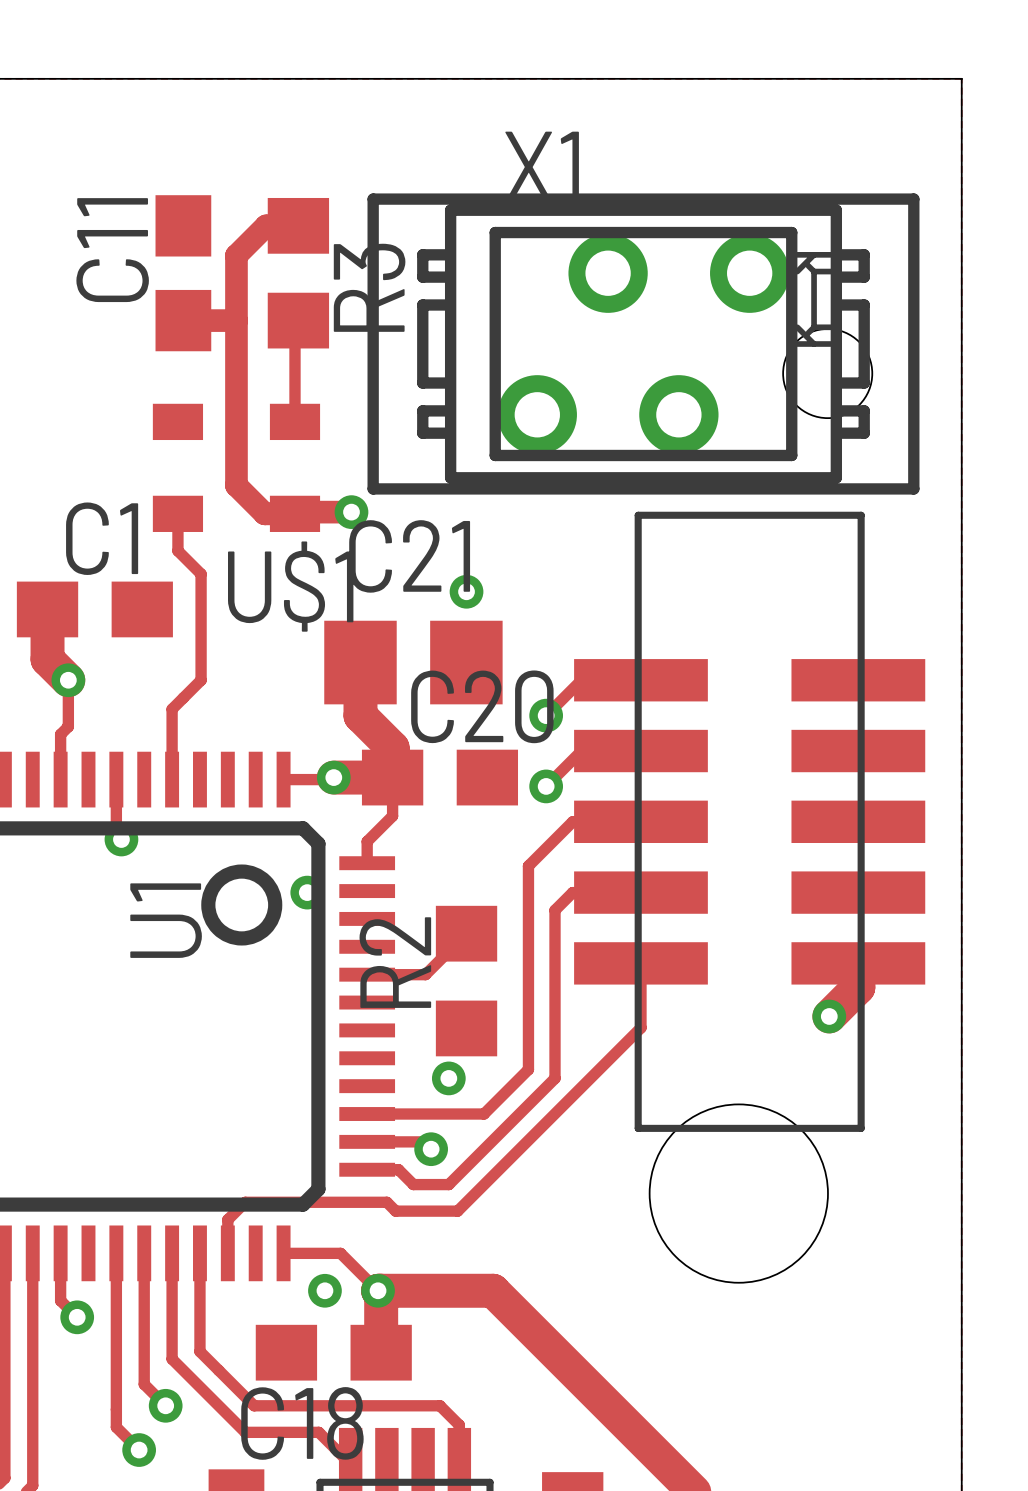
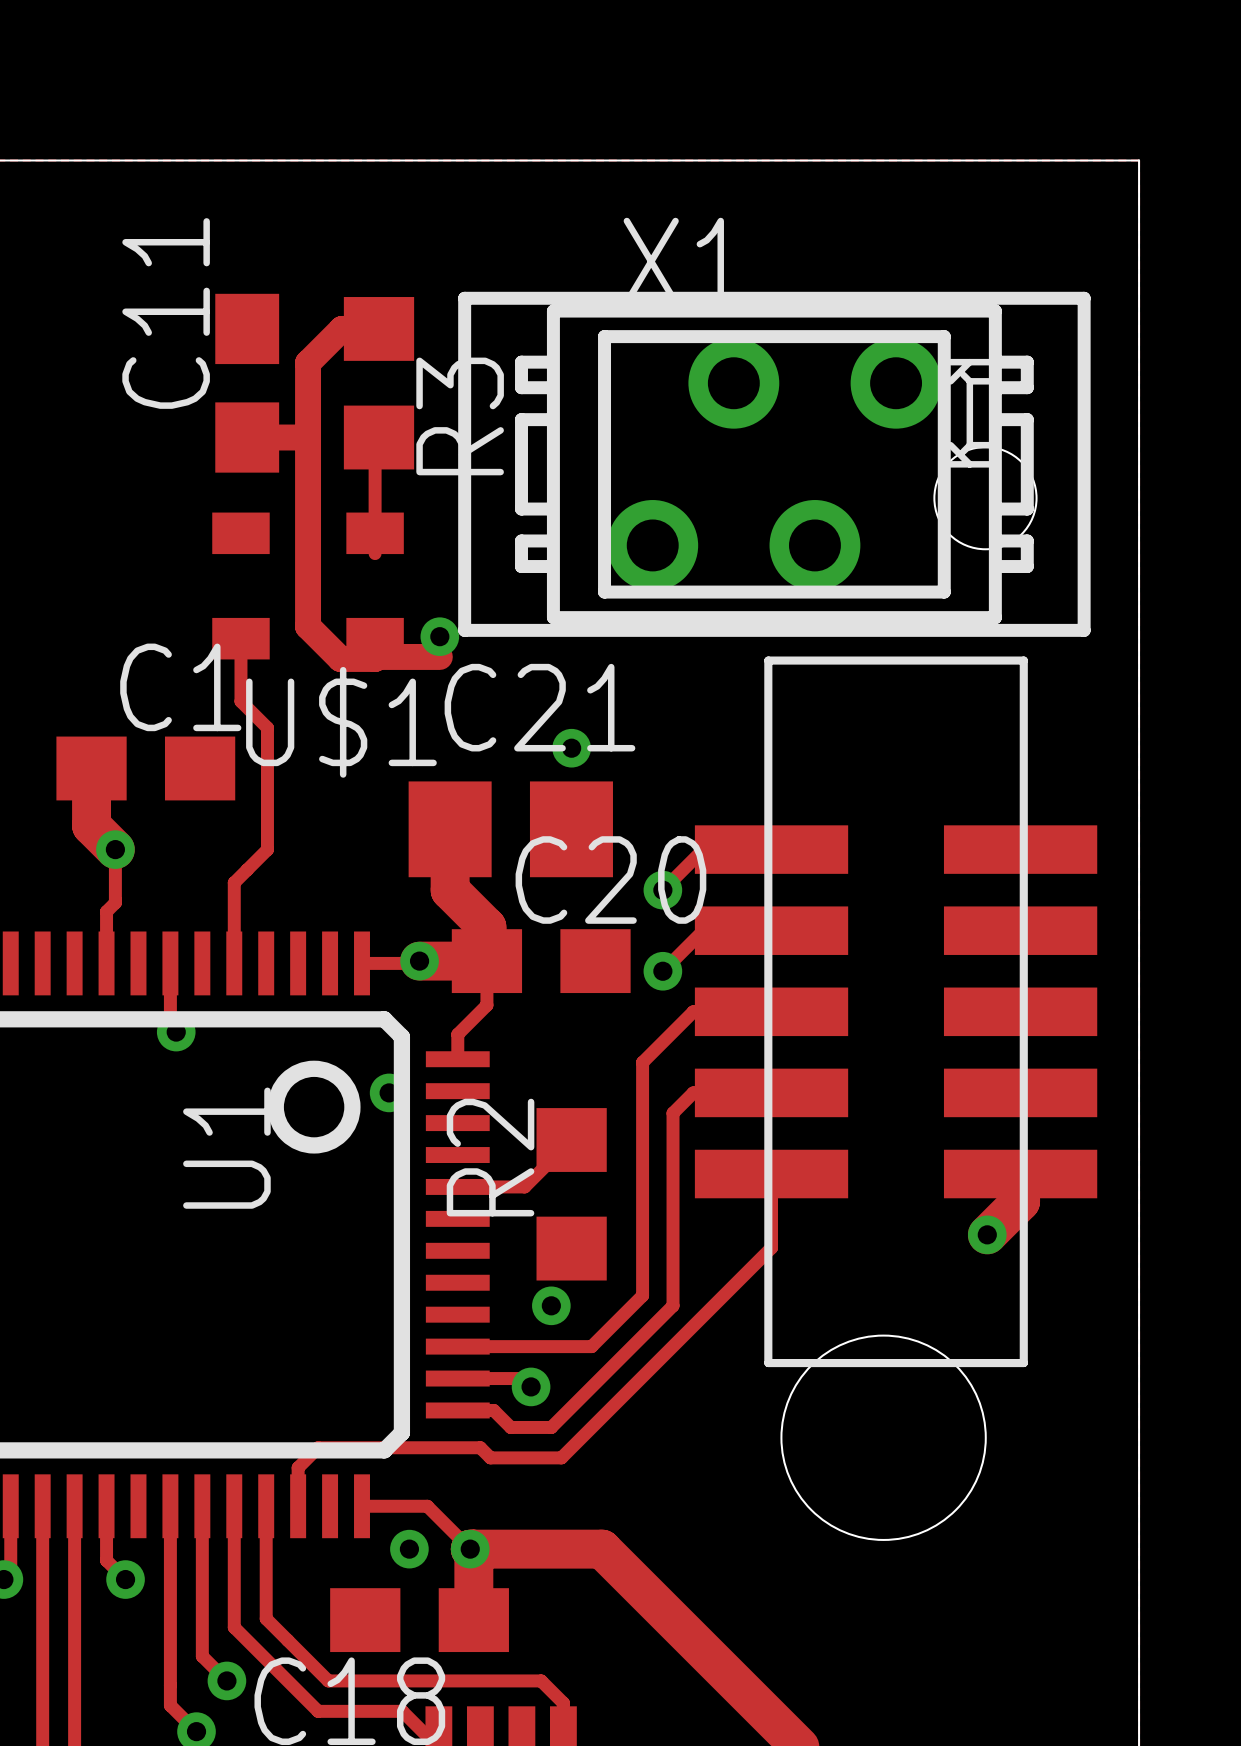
U$1 position: (236, 467) -> (308, 585)
via position: (351, 512) -> (439, 636)

